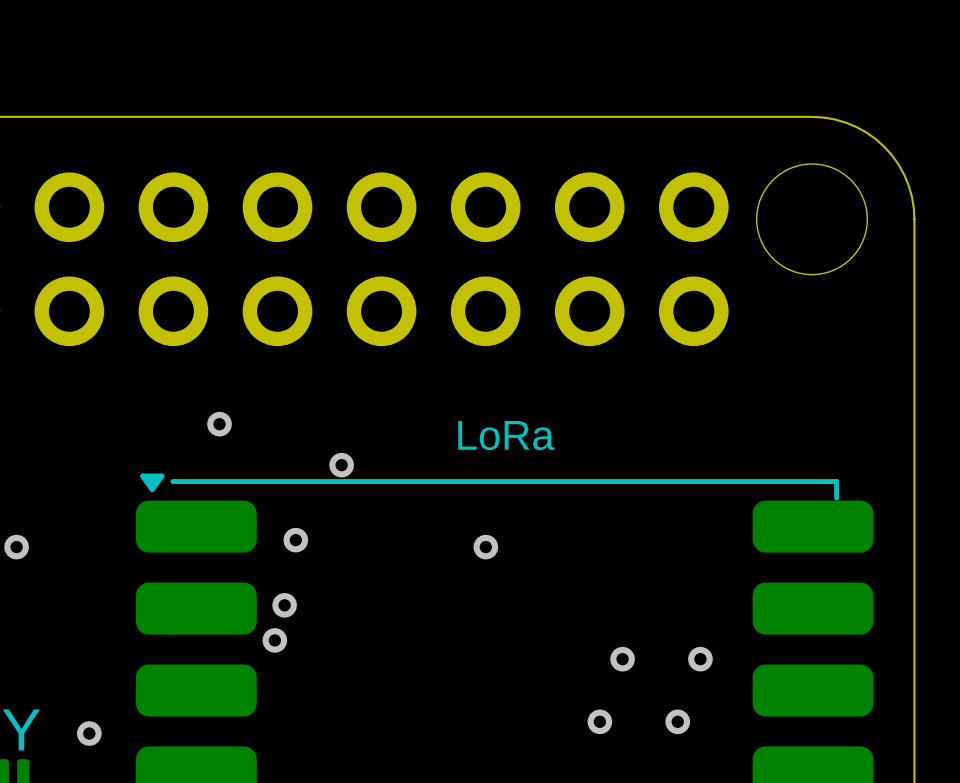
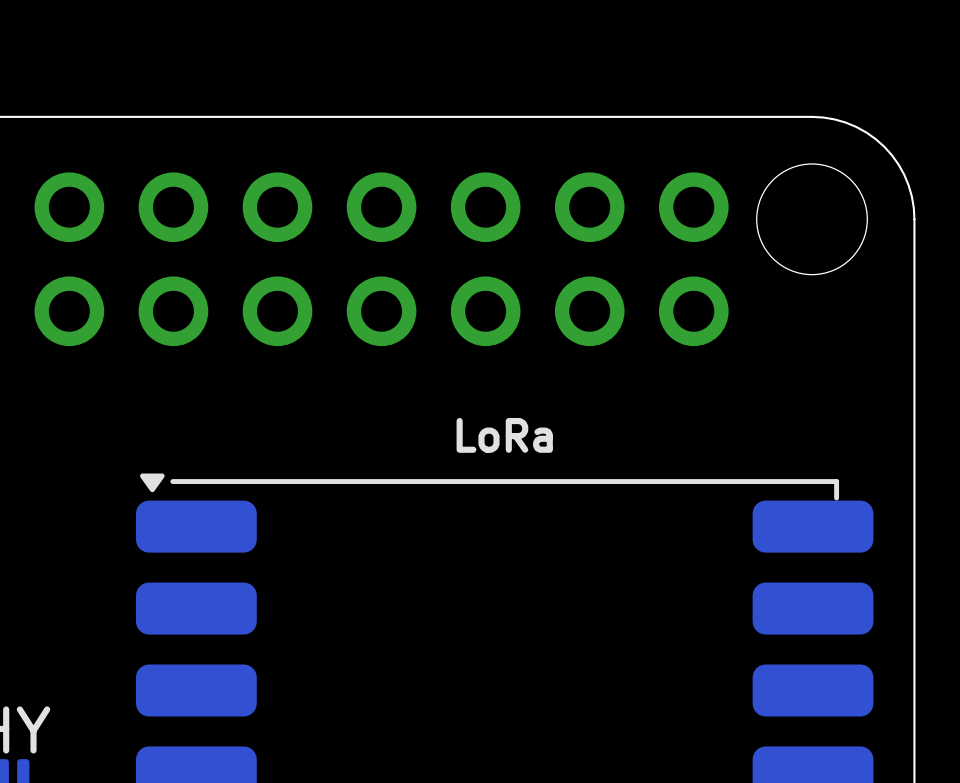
via: (219, 424) -> none
via: (341, 465) -> none
via: (295, 540) -> none
via: (16, 547) -> none
via: (485, 547) -> none
via: (284, 605) -> none
via: (274, 640) -> none
via: (622, 659) -> none
via: (700, 659) -> none
via: (599, 721) -> none
via: (677, 721) -> none
via: (89, 733) -> none

